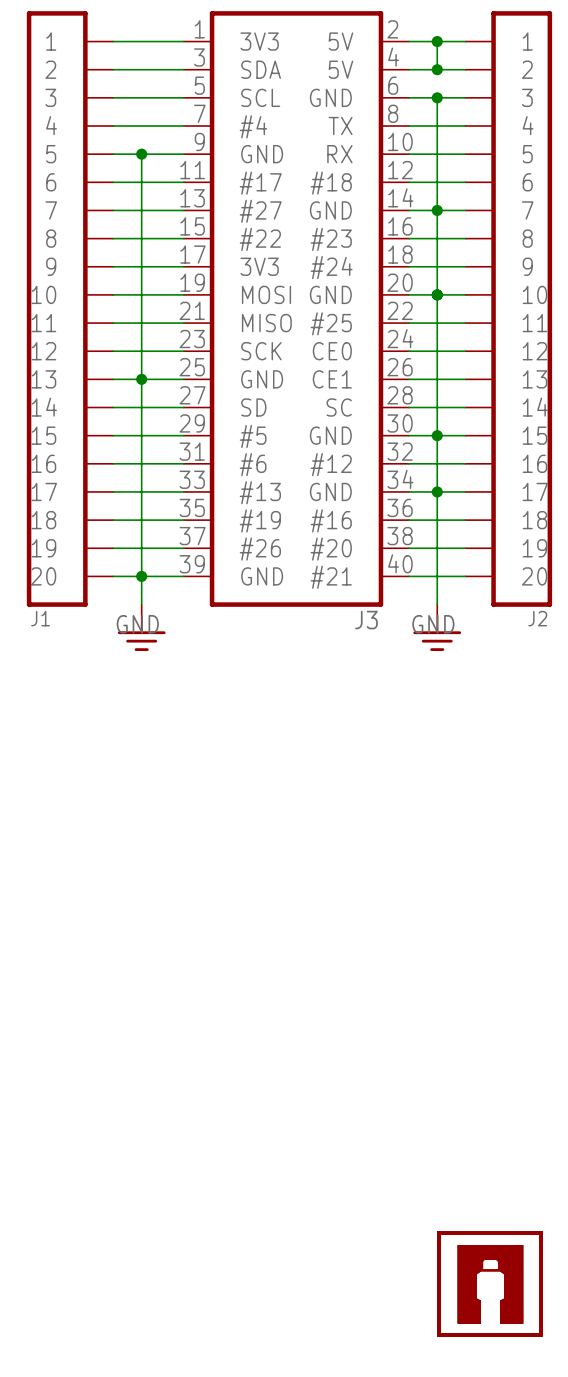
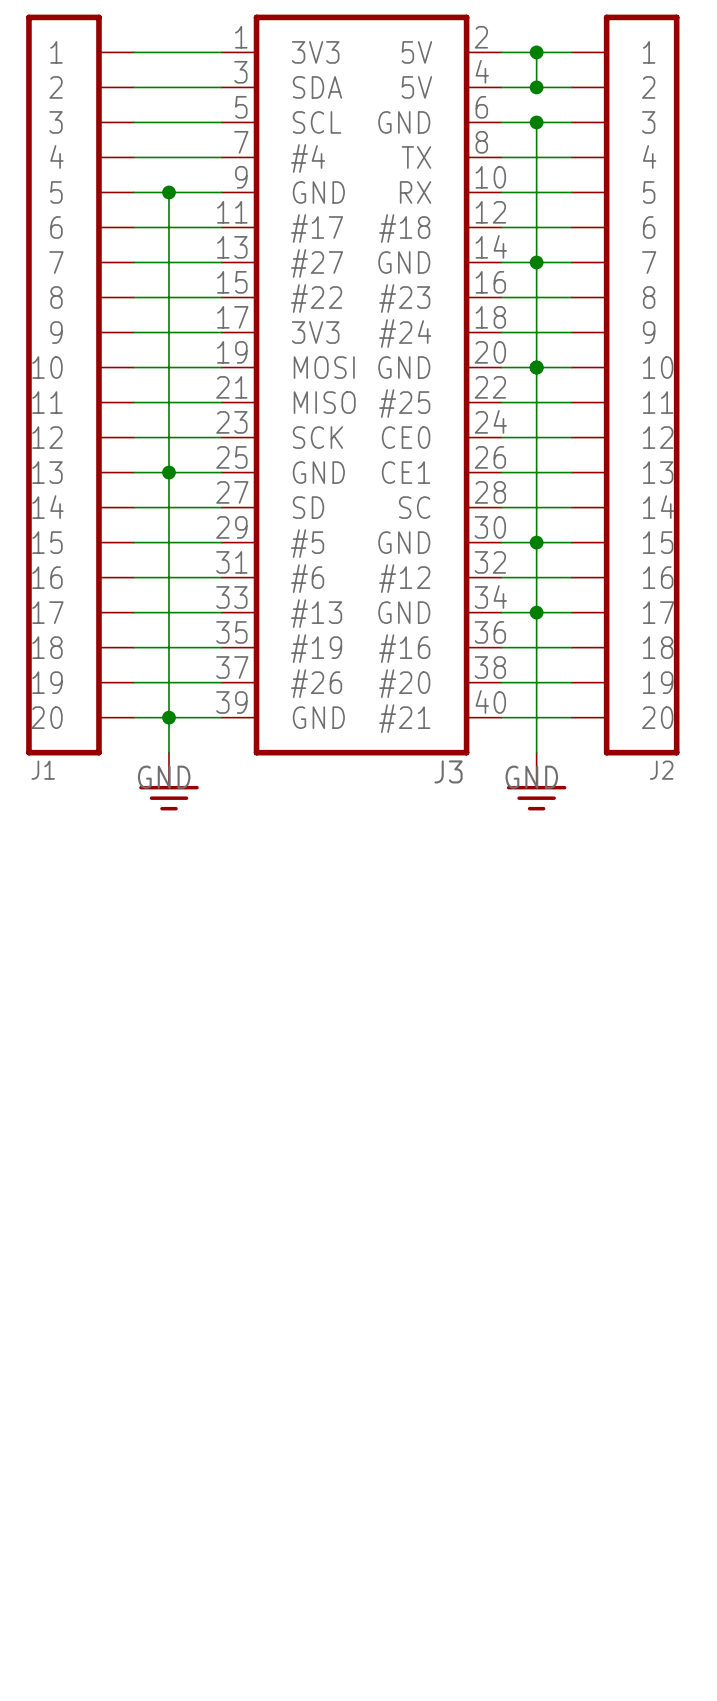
part: (489, 1283) -> none

